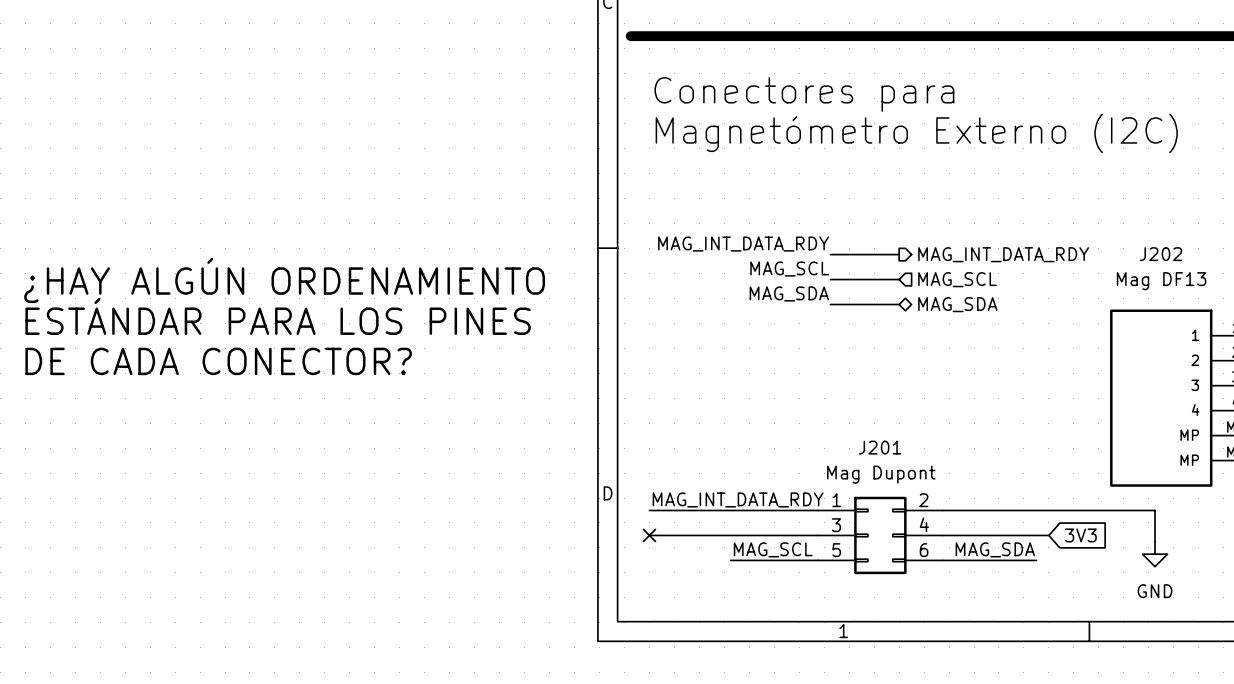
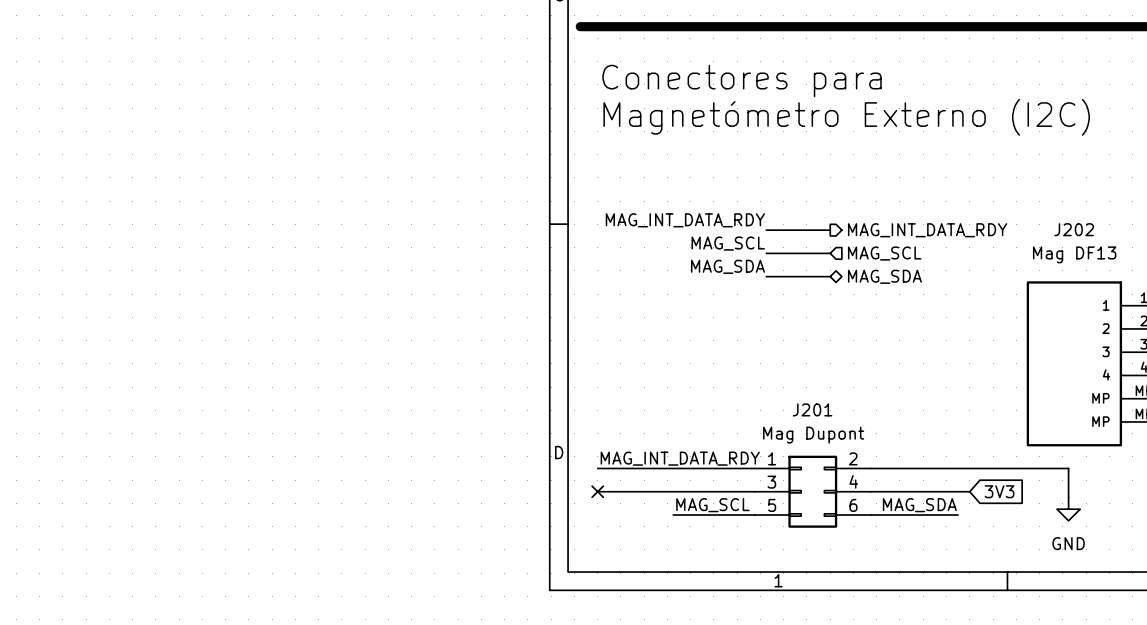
text: ¿HAY ALGÚN ORDENAMIENTO (284, 280) -> none
text: ESTÁNDAR PARA LOS PINES (278, 316) -> none
text: DE CADA CONECTOR? (218, 361) -> none

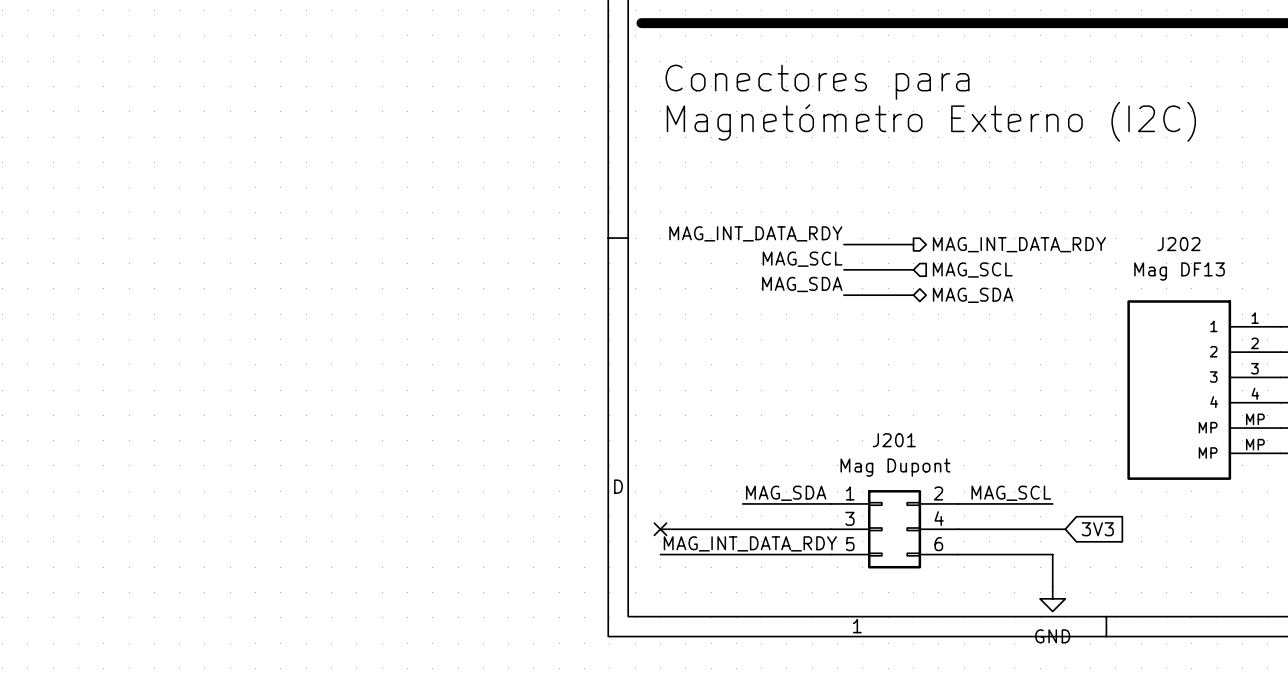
label position: MAG_INT_DATA_RDY (680, 458) -> MAG_INT_DATA_RDY (750, 543)
label: none -> MAG_SDA (786, 493)
label: none -> MAG_SCL (1011, 493)
wire: (597, 468) (673, 468) -> (660, 554) (742, 554)
wire: (958, 468) (1068, 468) (1068, 497) -> none
label: MAG_SCL (712, 505) -> none
label: MAG_SDA (919, 505) -> none
power symbol position: GND (1068, 509) -> GND (1052, 598)
wire: none -> (1052, 554) (1052, 586)

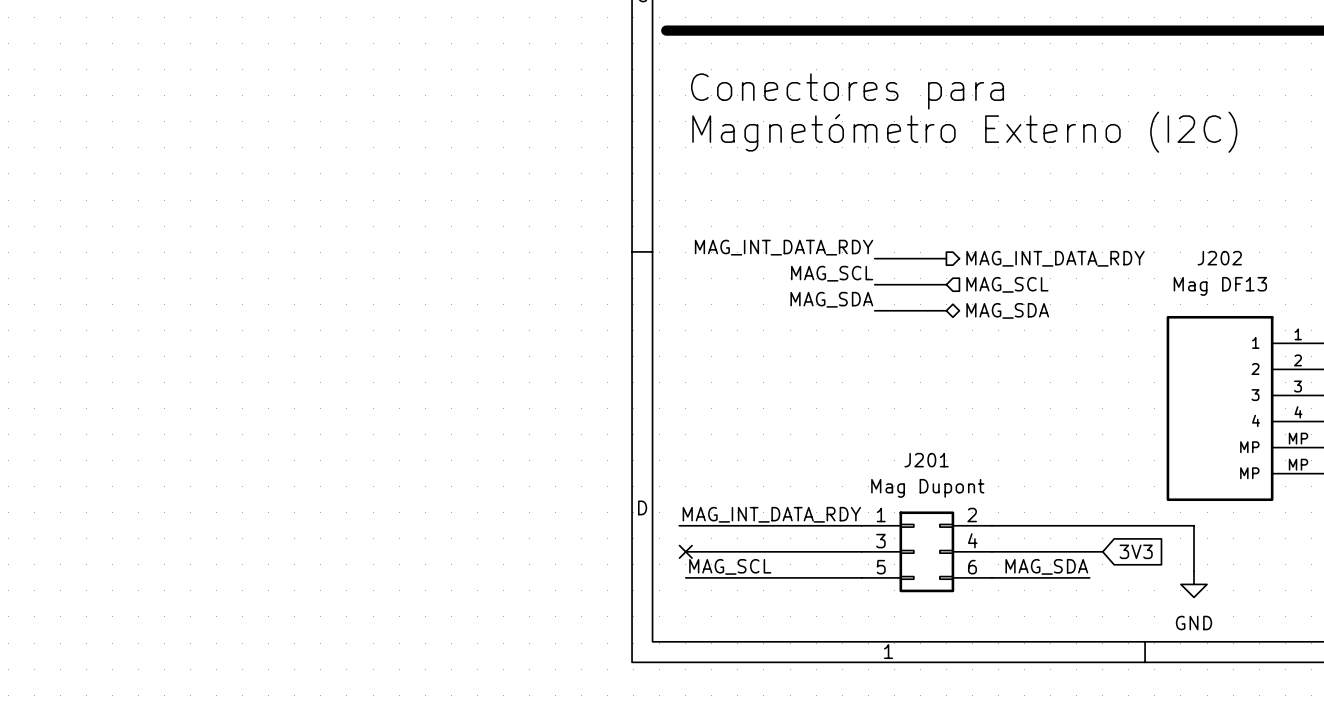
label: none -> MAG_INT_DATA_RDY (771, 514)
label: MAG_SDA (786, 493) -> none
label: MAG_SCL (1011, 493) -> none
wire: none -> (679, 525) (770, 525)
wire: none -> (1089, 525) (1193, 525) (1193, 571)
label: MAG_INT_DATA_RDY (750, 543) -> MAG_SCL (730, 566)
label: none -> MAG_SDA (1046, 566)
wire: (1052, 554) (1052, 586) -> none
power symbol position: GND (1052, 598) -> GND (1193, 584)

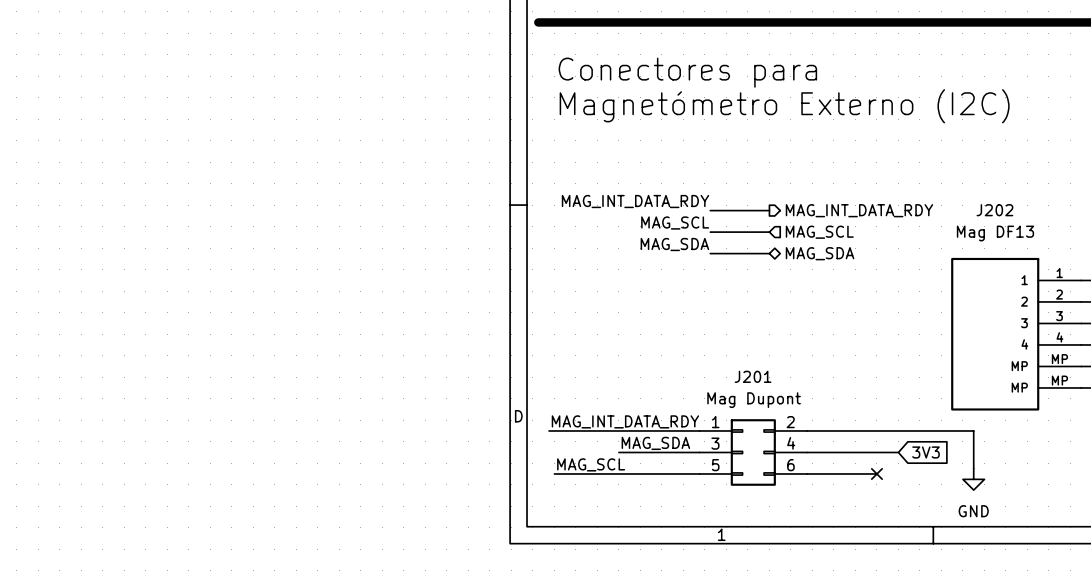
label: none -> MAG_SDA (655, 443)
wire: (685, 551) (763, 551) -> none
no-connect mark: (685, 551) -> none
label: MAG_SDA (1046, 566) -> none
wire: (1076, 577) (1089, 577) -> none
no-connect mark: none -> (876, 473)

